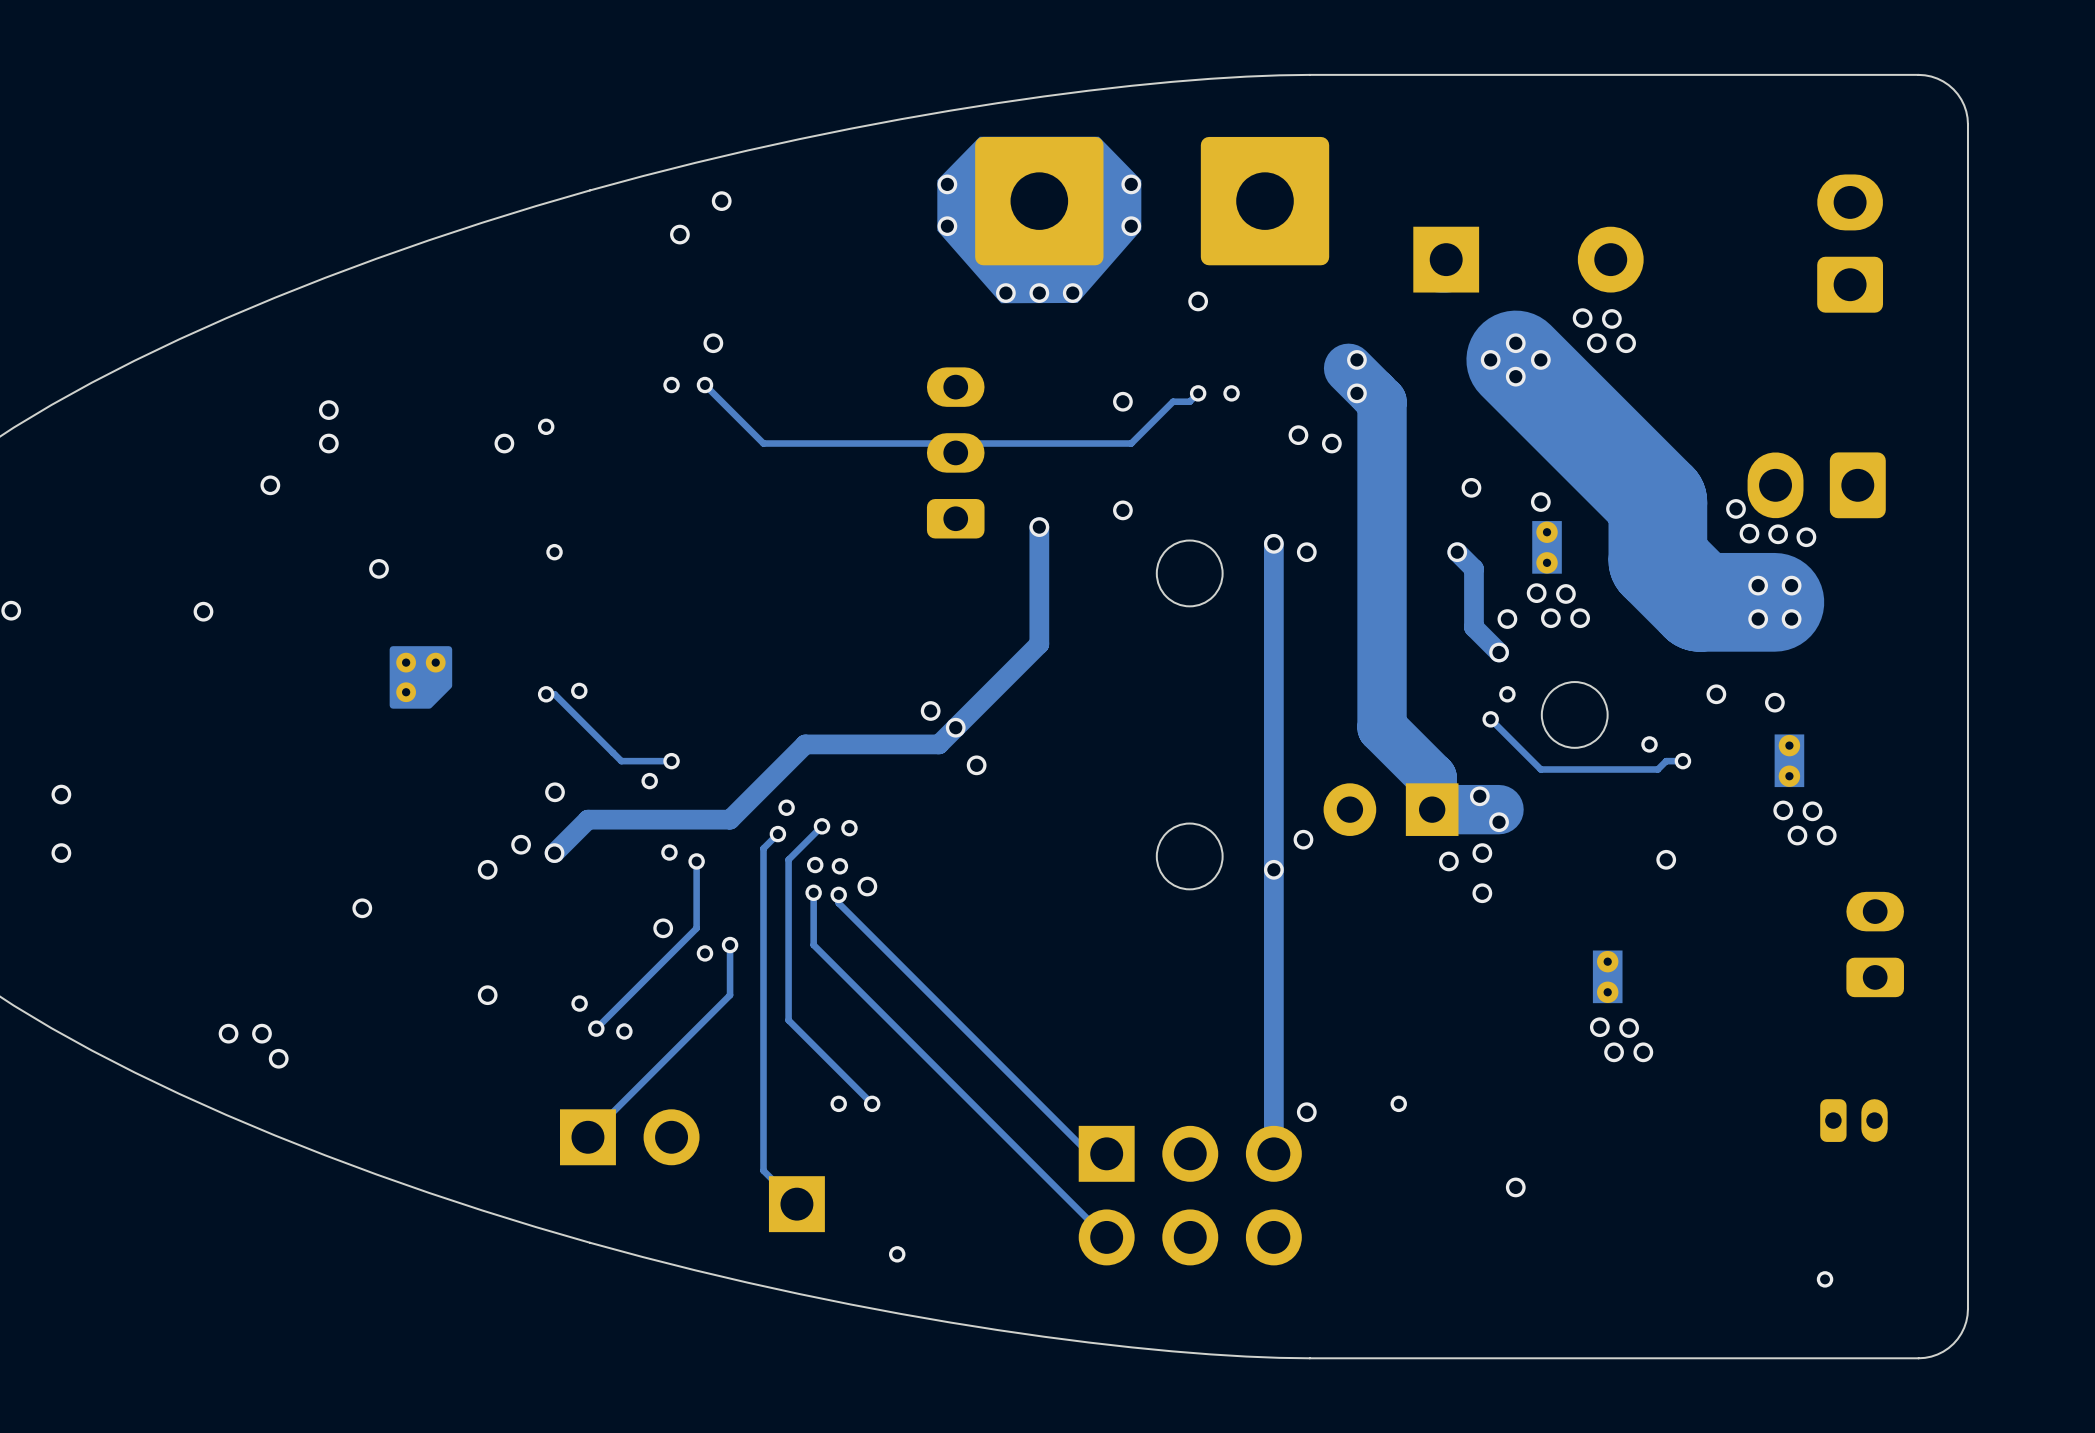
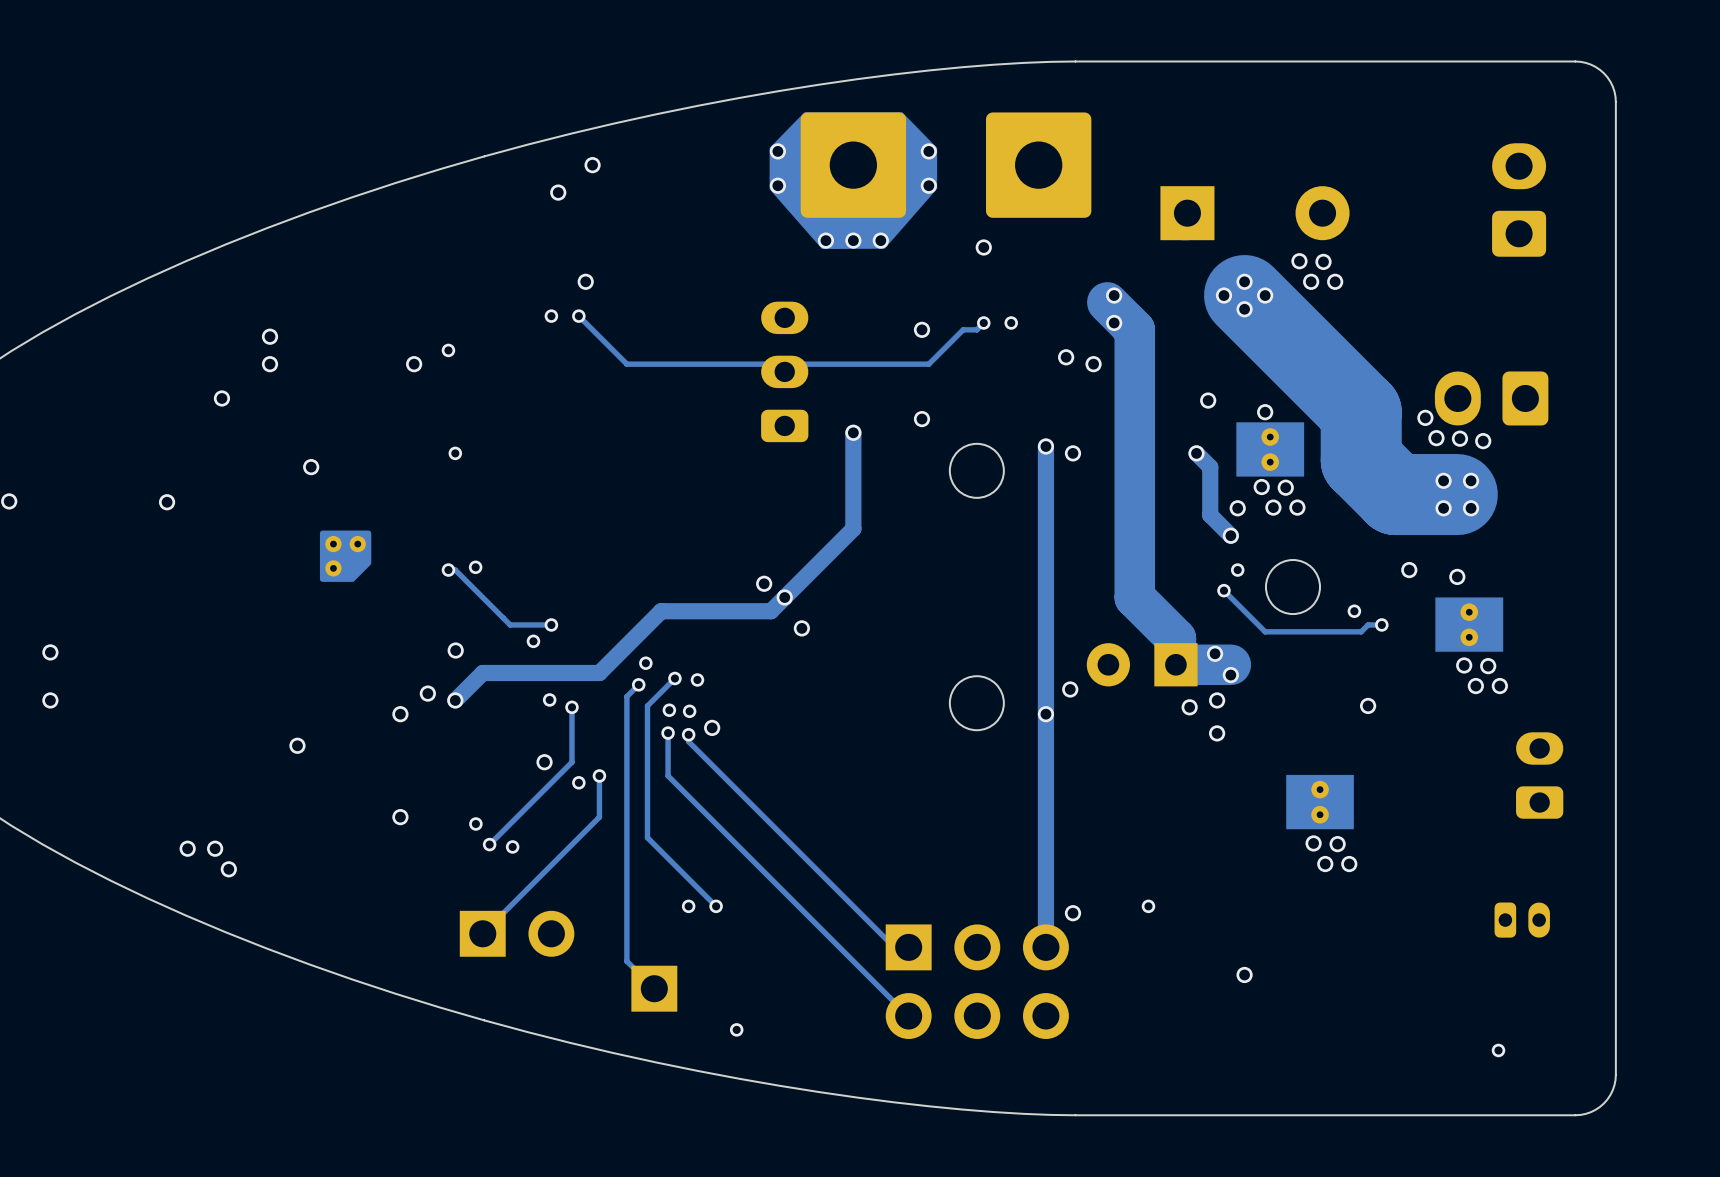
drawing: none -> [1236, 422, 1305, 477]
drawing: none -> [1435, 597, 1504, 652]
drawing: none -> [1286, 774, 1354, 830]

